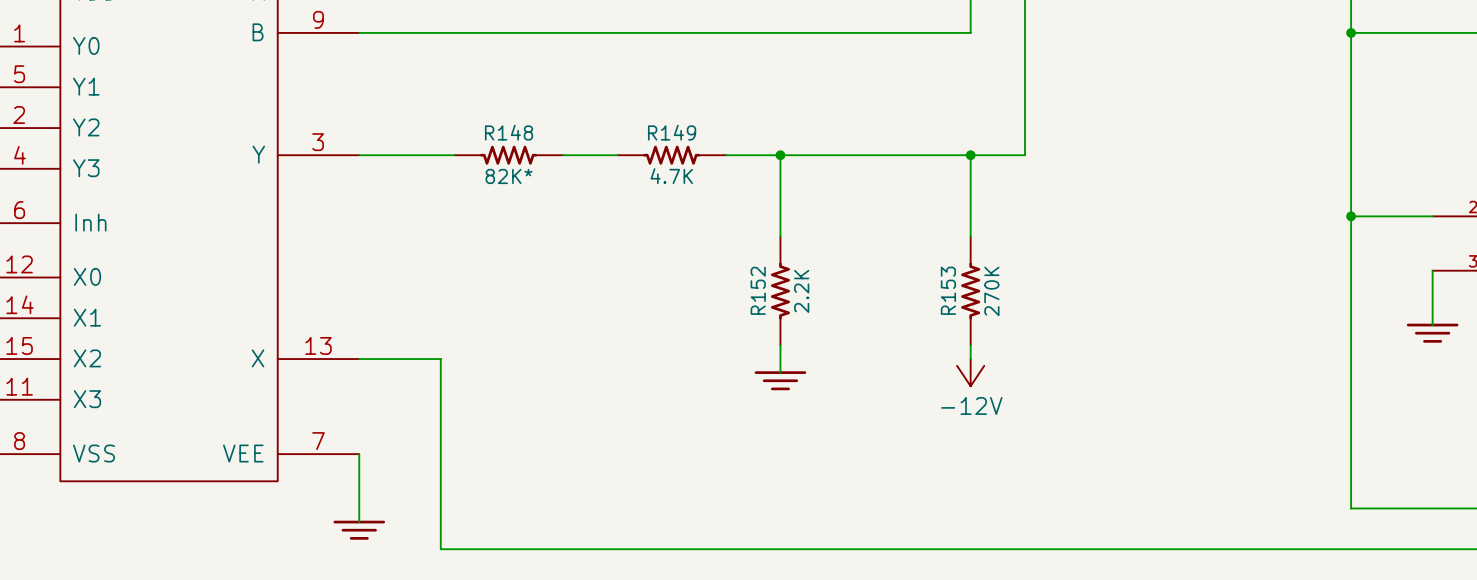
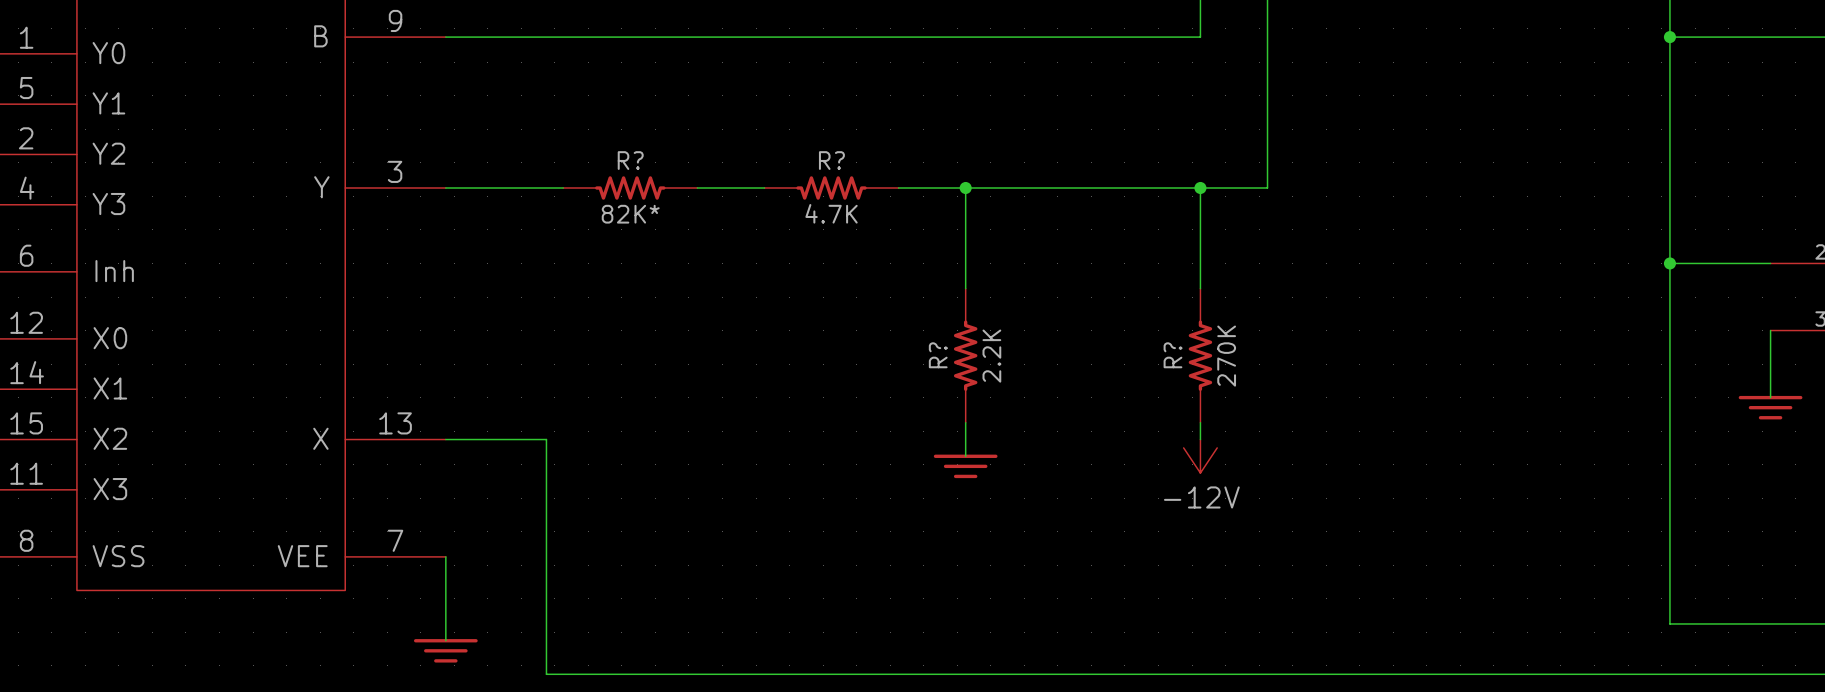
R148 name: R148 (509, 132) -> R? (630, 160)
R149 name: R149 (672, 132) -> R? (831, 160)
R152 name: R152 (758, 290) -> R? (938, 355)
R153 name: R153 (948, 290) -> R? (1172, 355)

